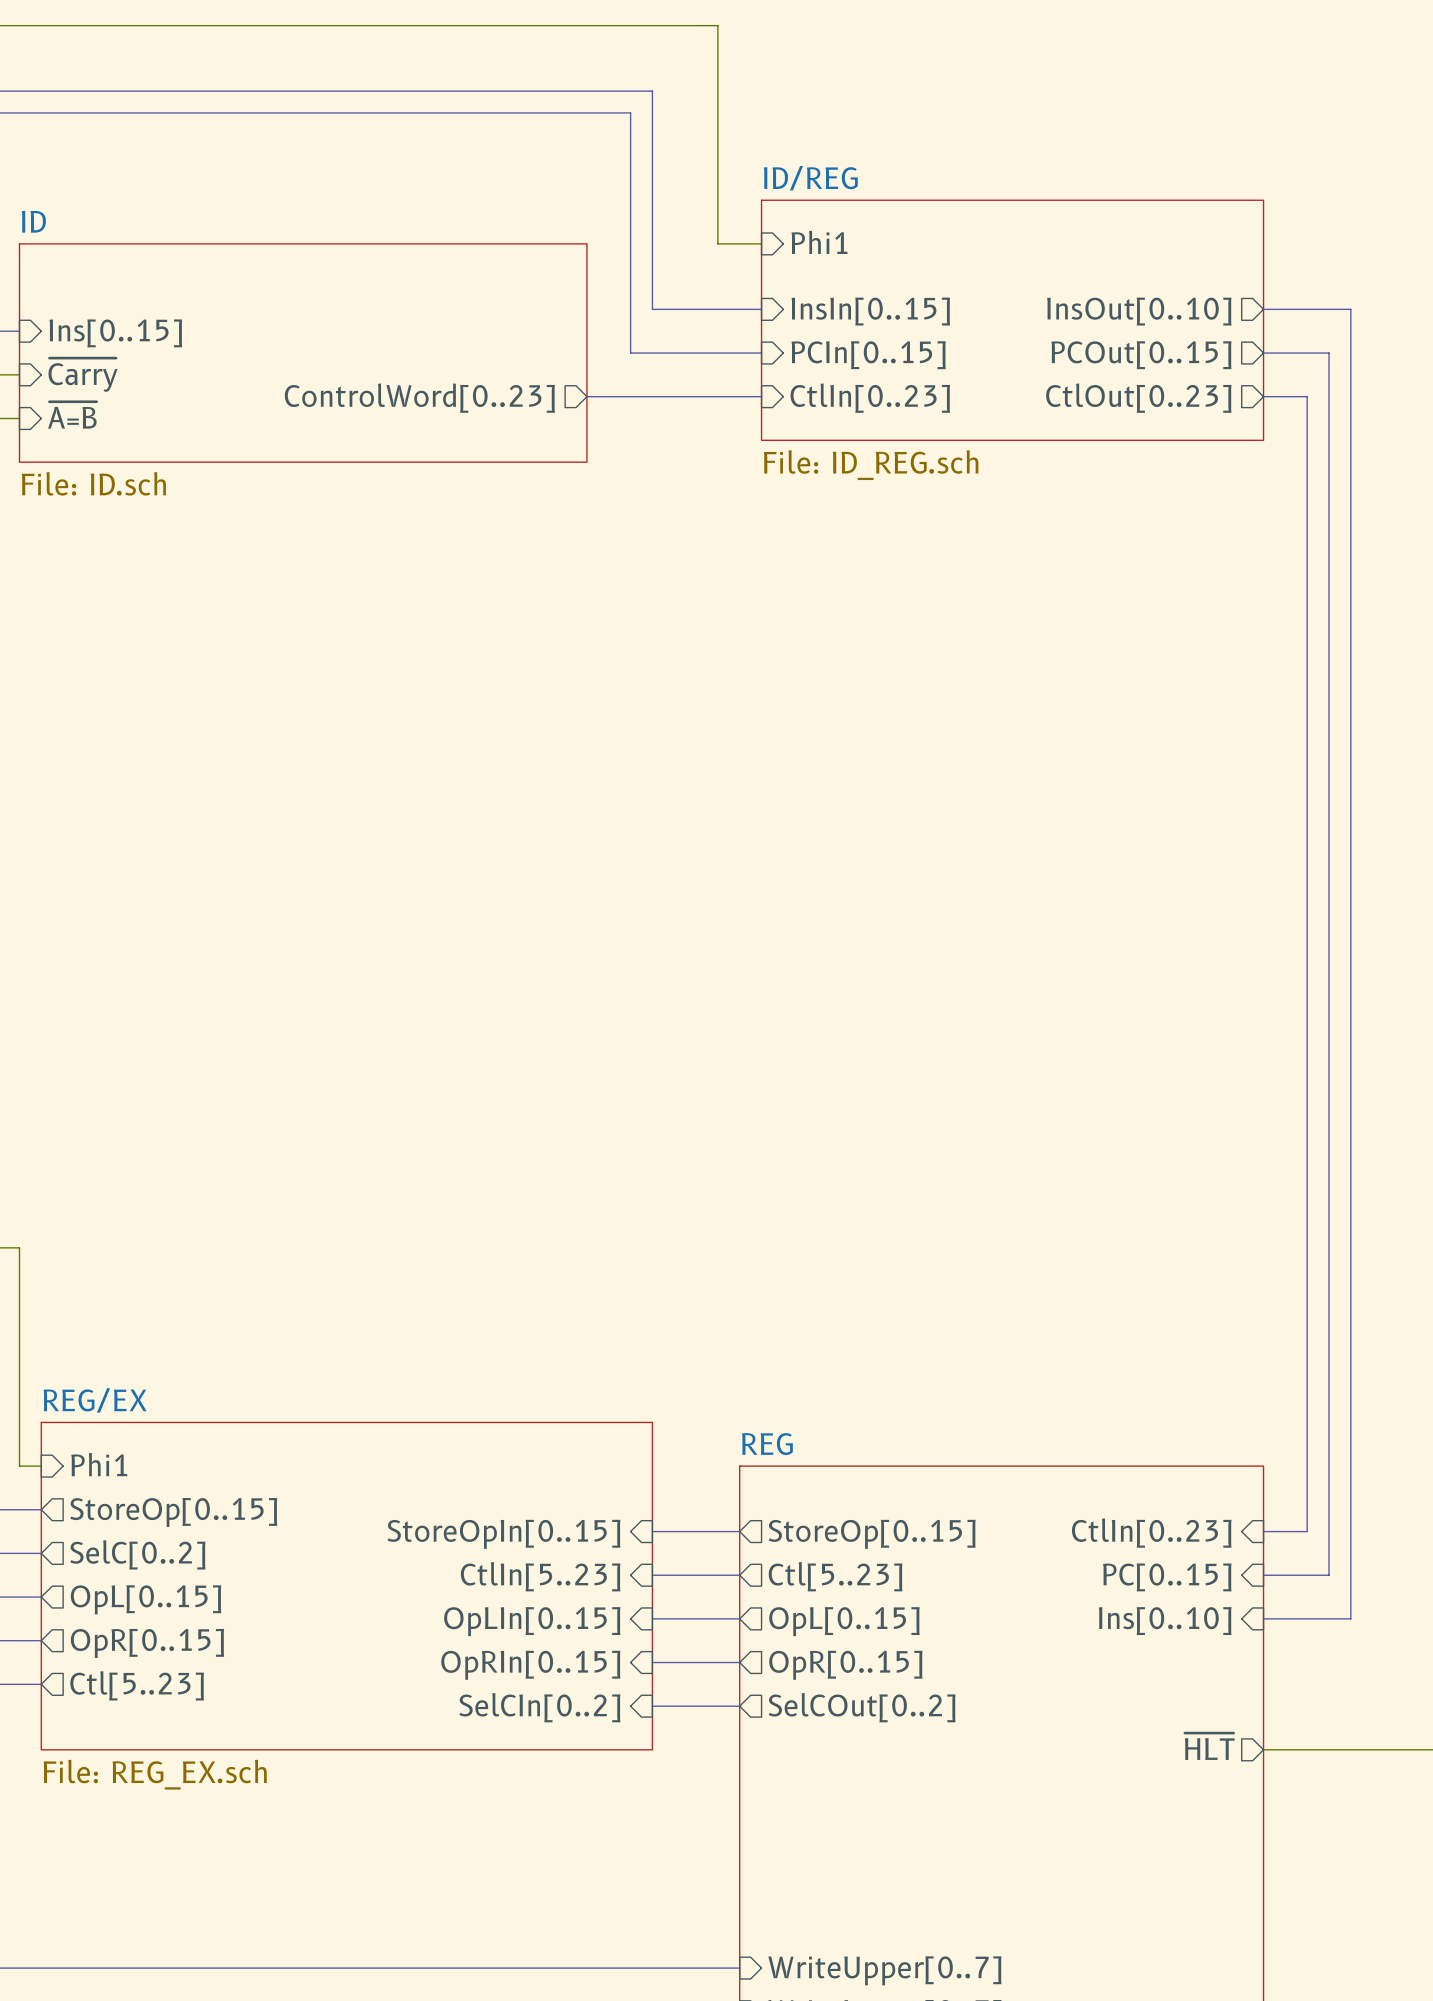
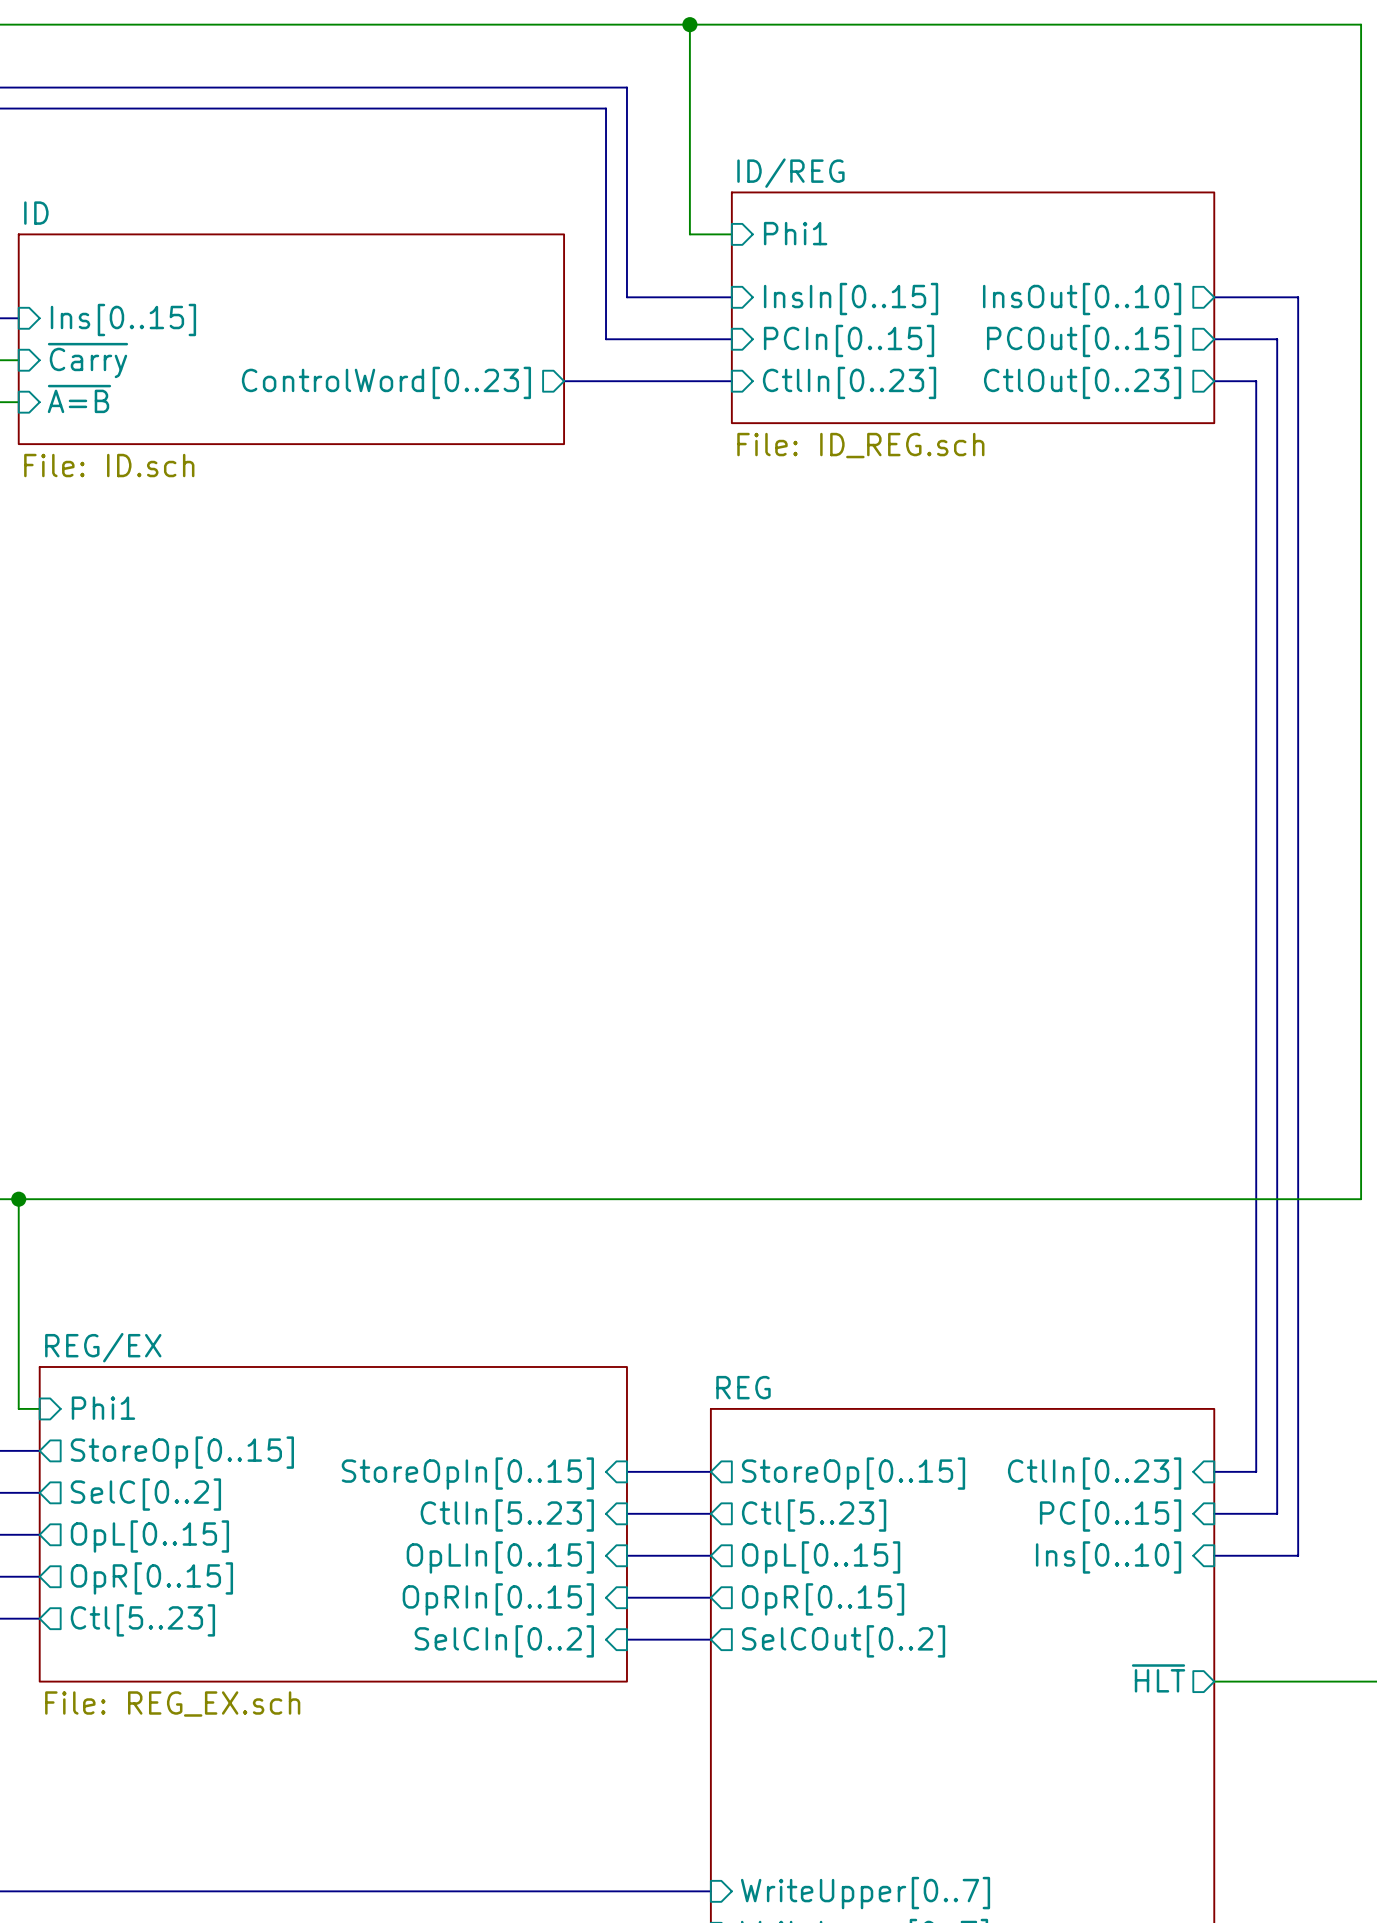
wire: none -> (689, 24) (1361, 24) (1361, 1199) (18, 1199)
junction: none -> (689, 24)
junction: none -> (18, 1199)

